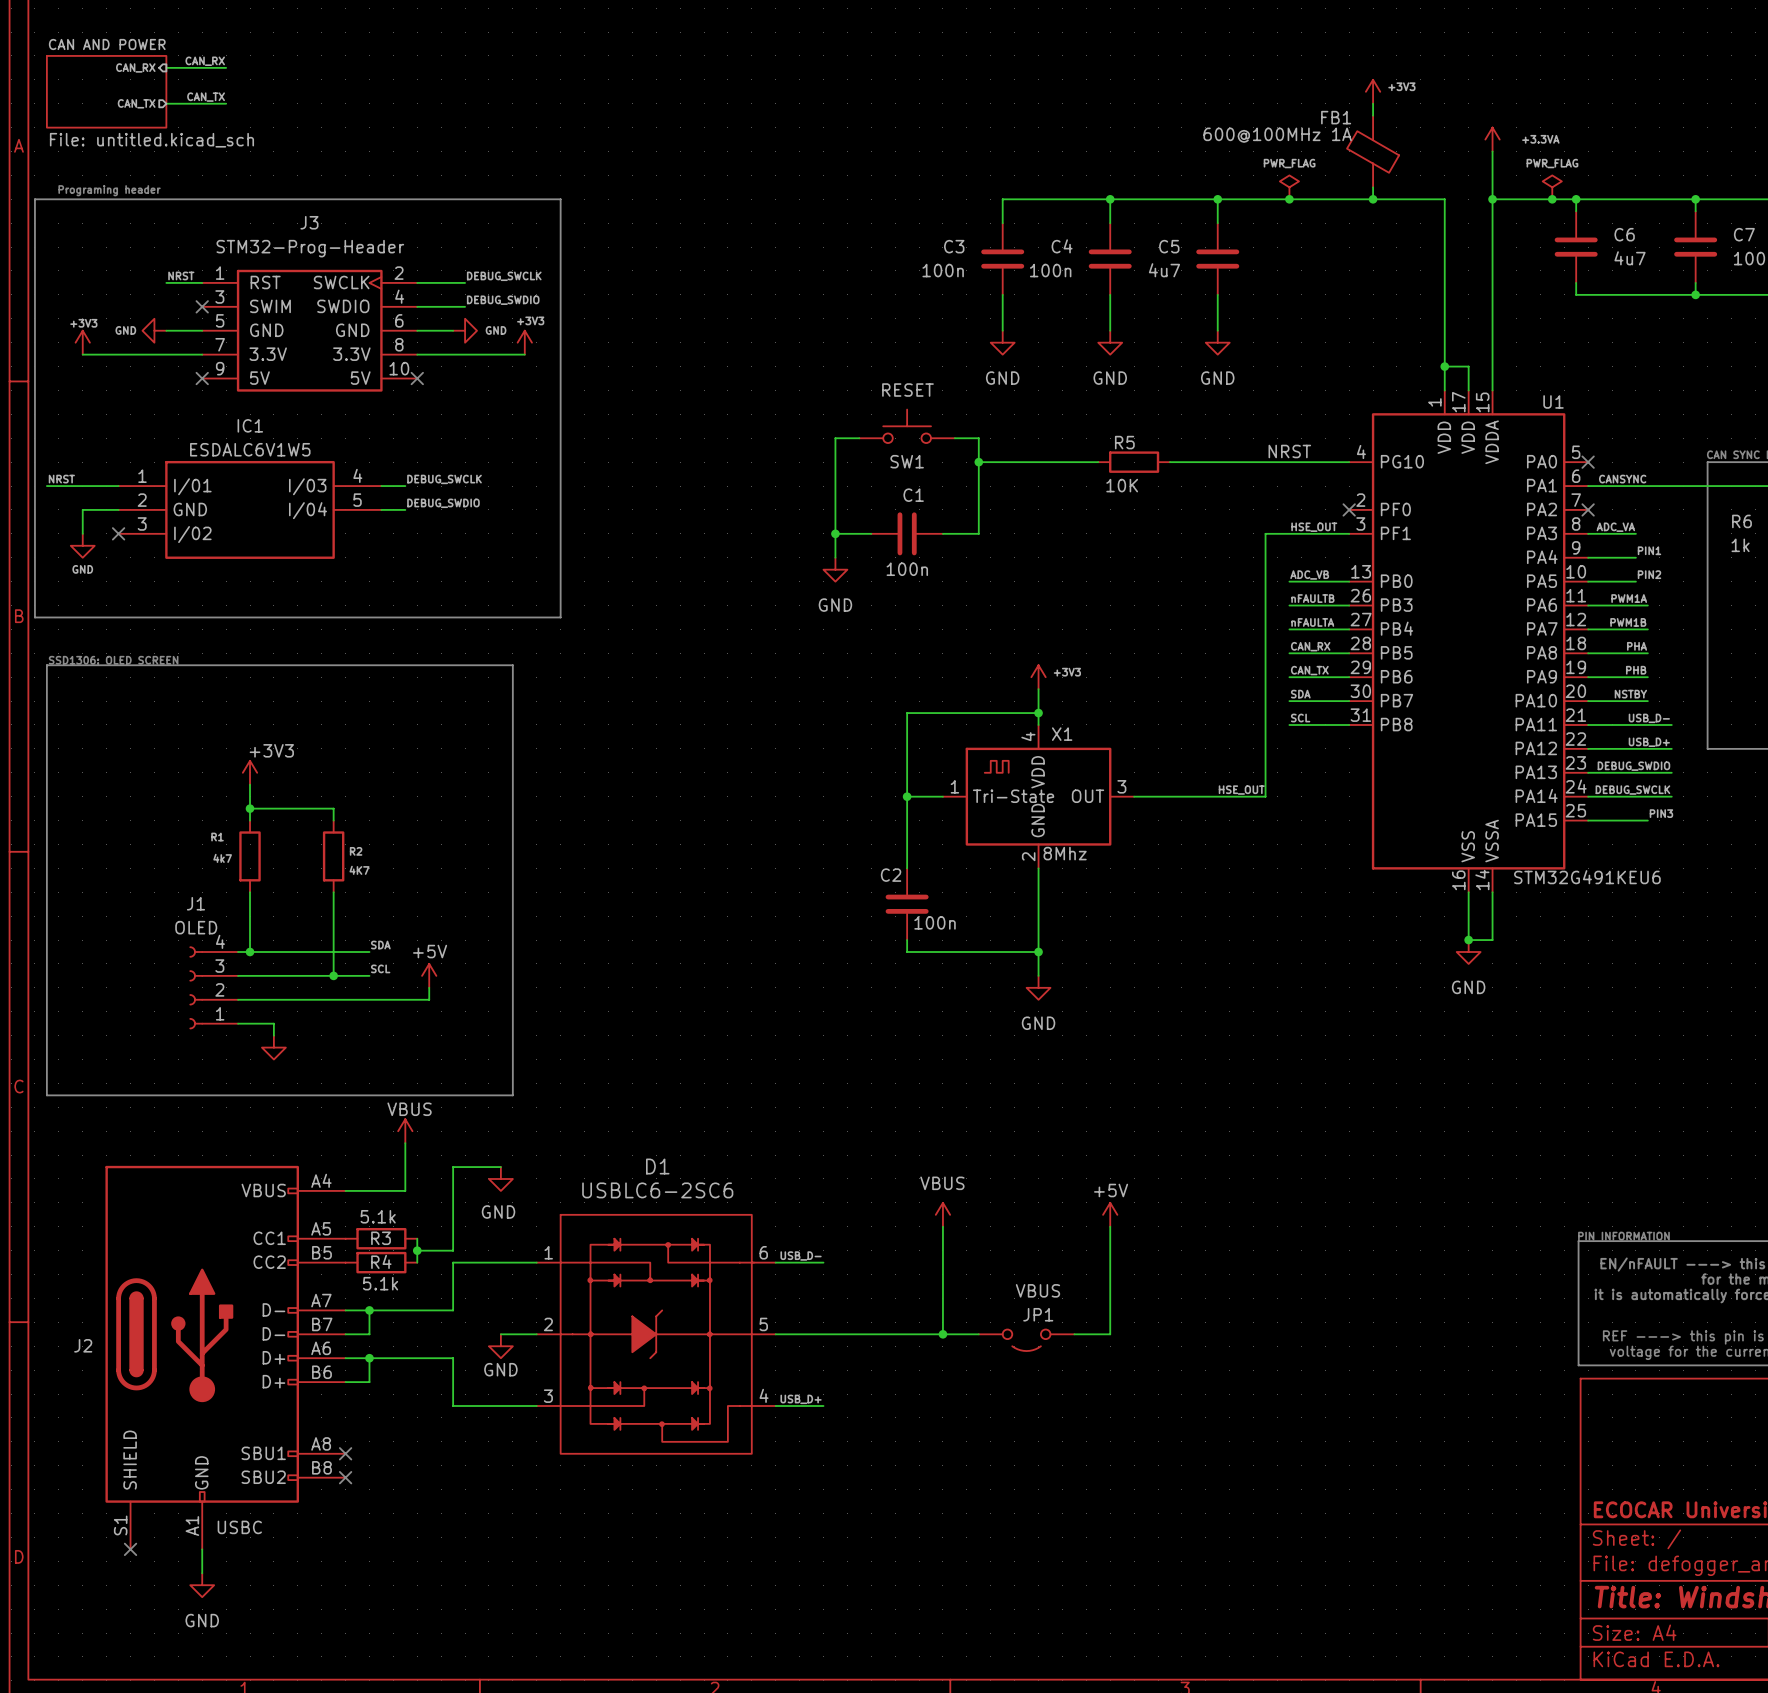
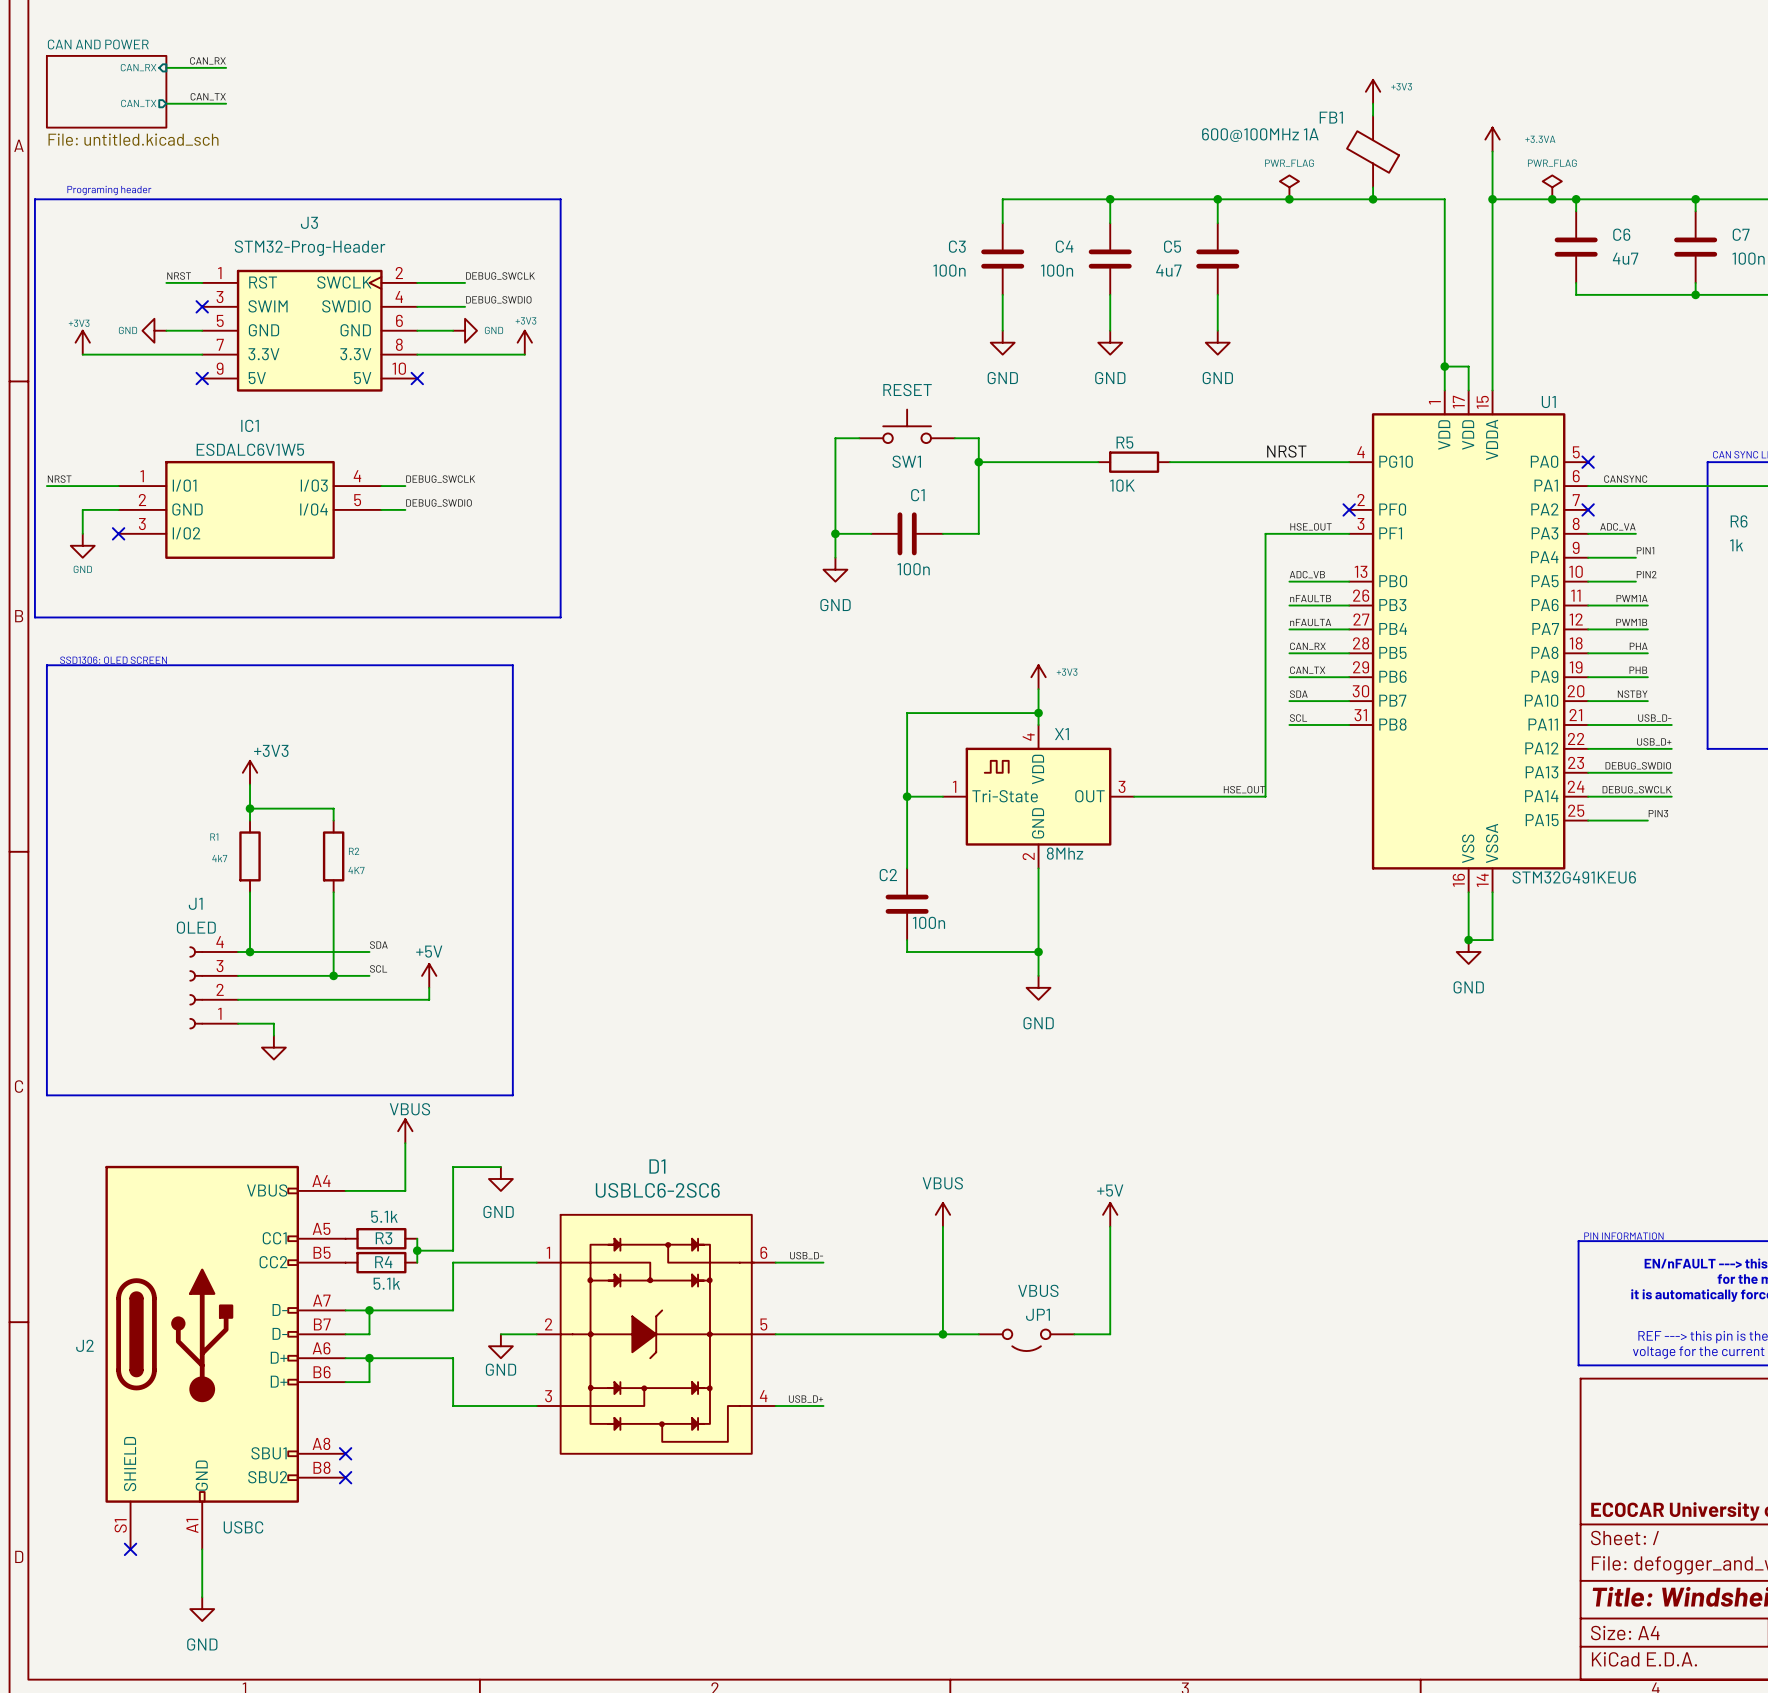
power symbol position: GND (202, 1585) -> GND (202, 1609)

